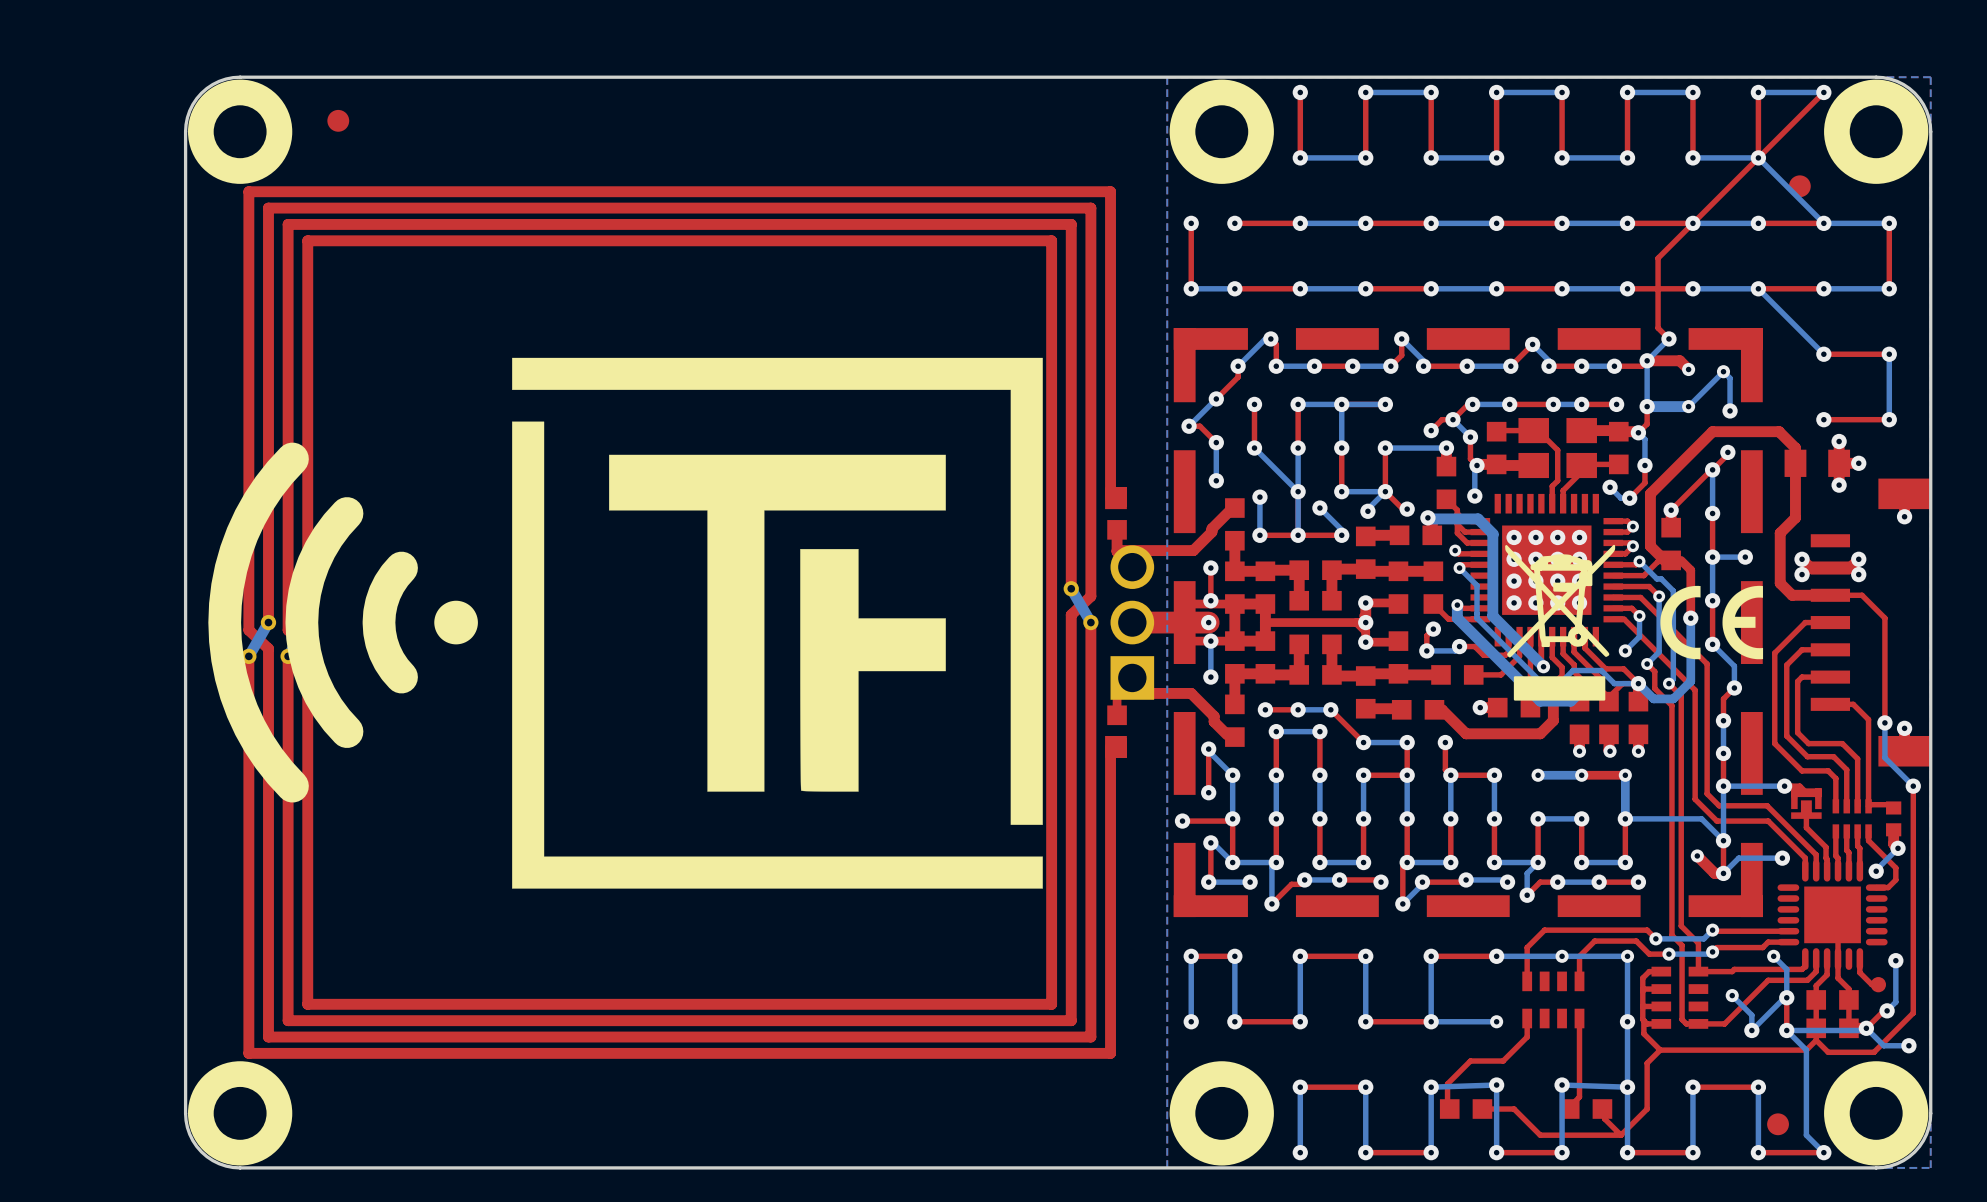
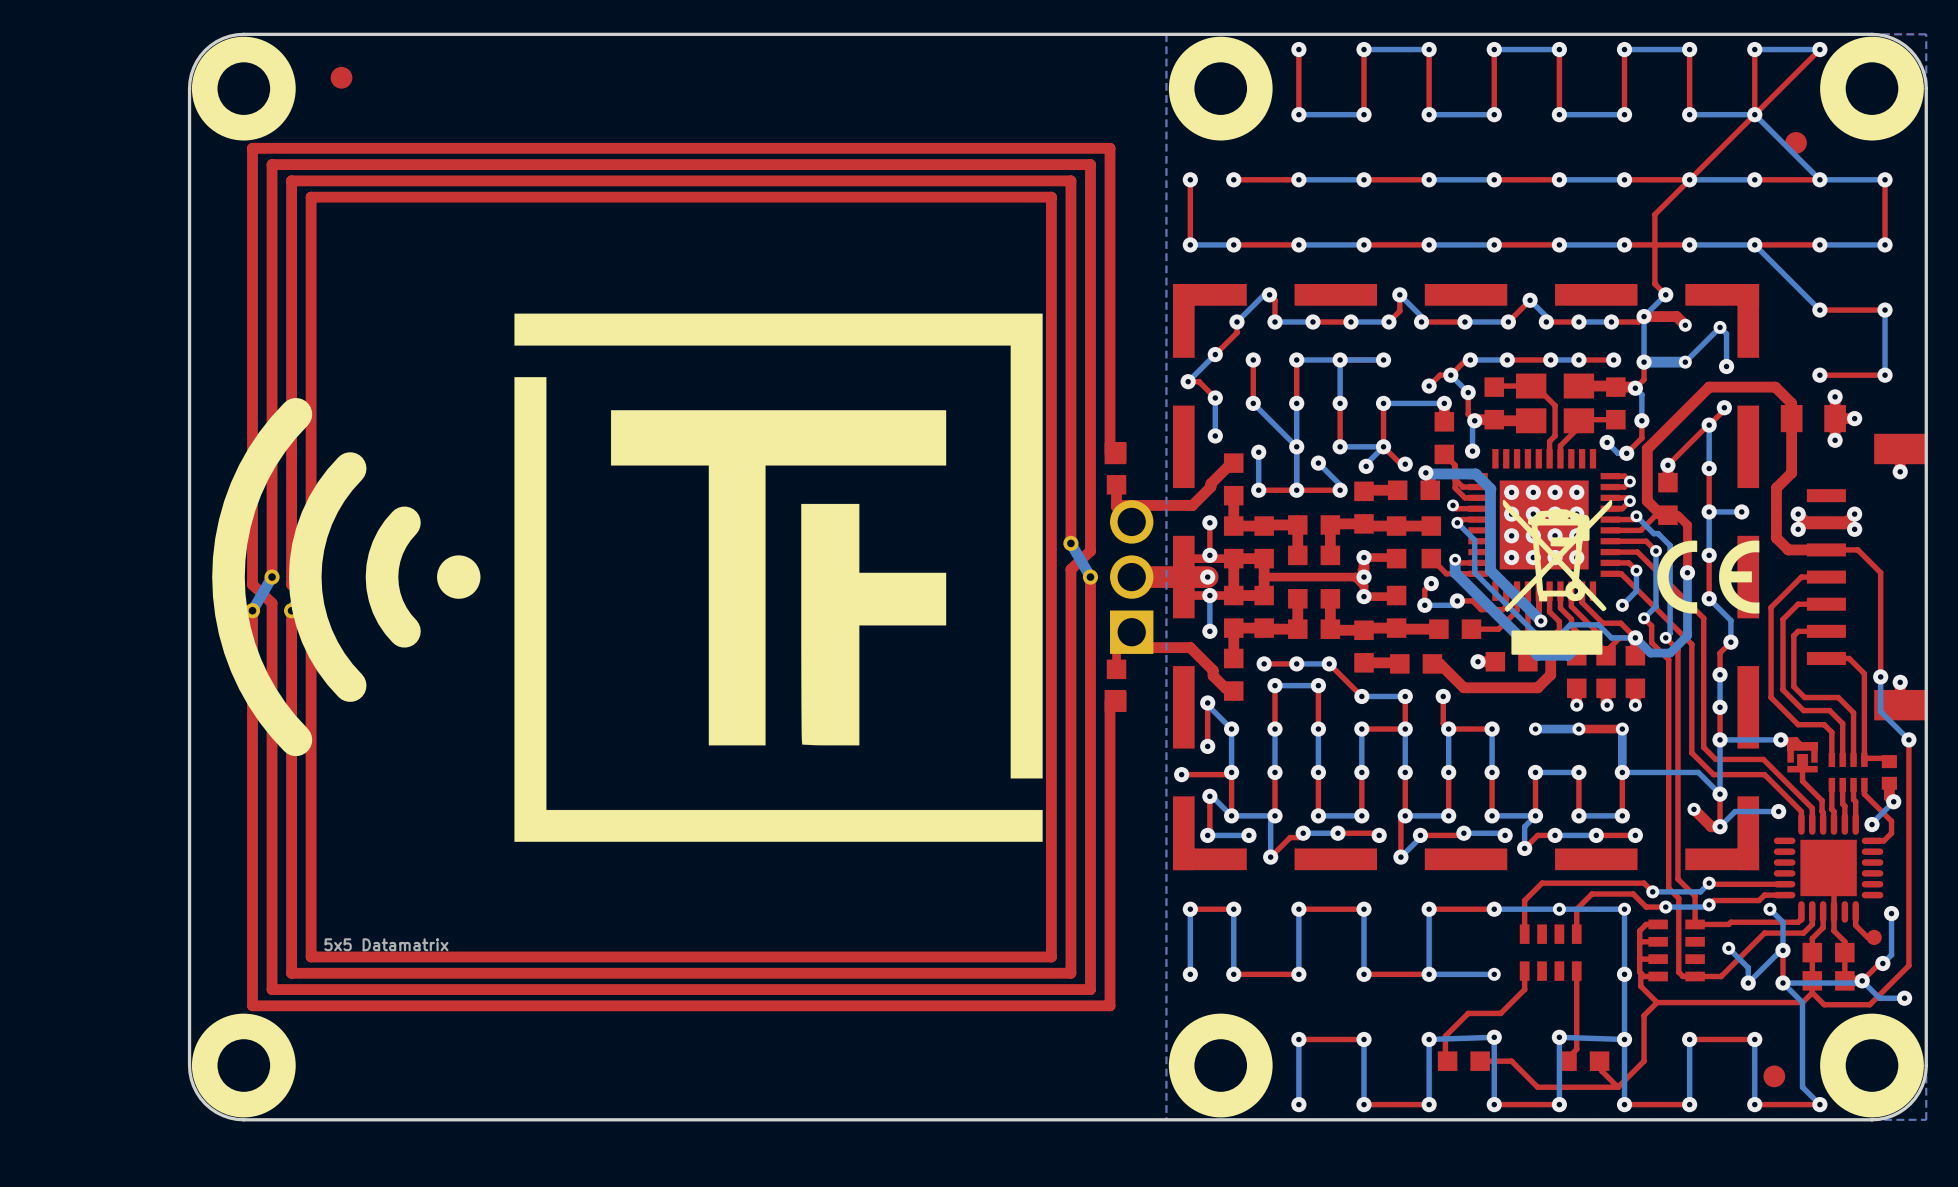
drawing: none -> [324, 938, 449, 952]

